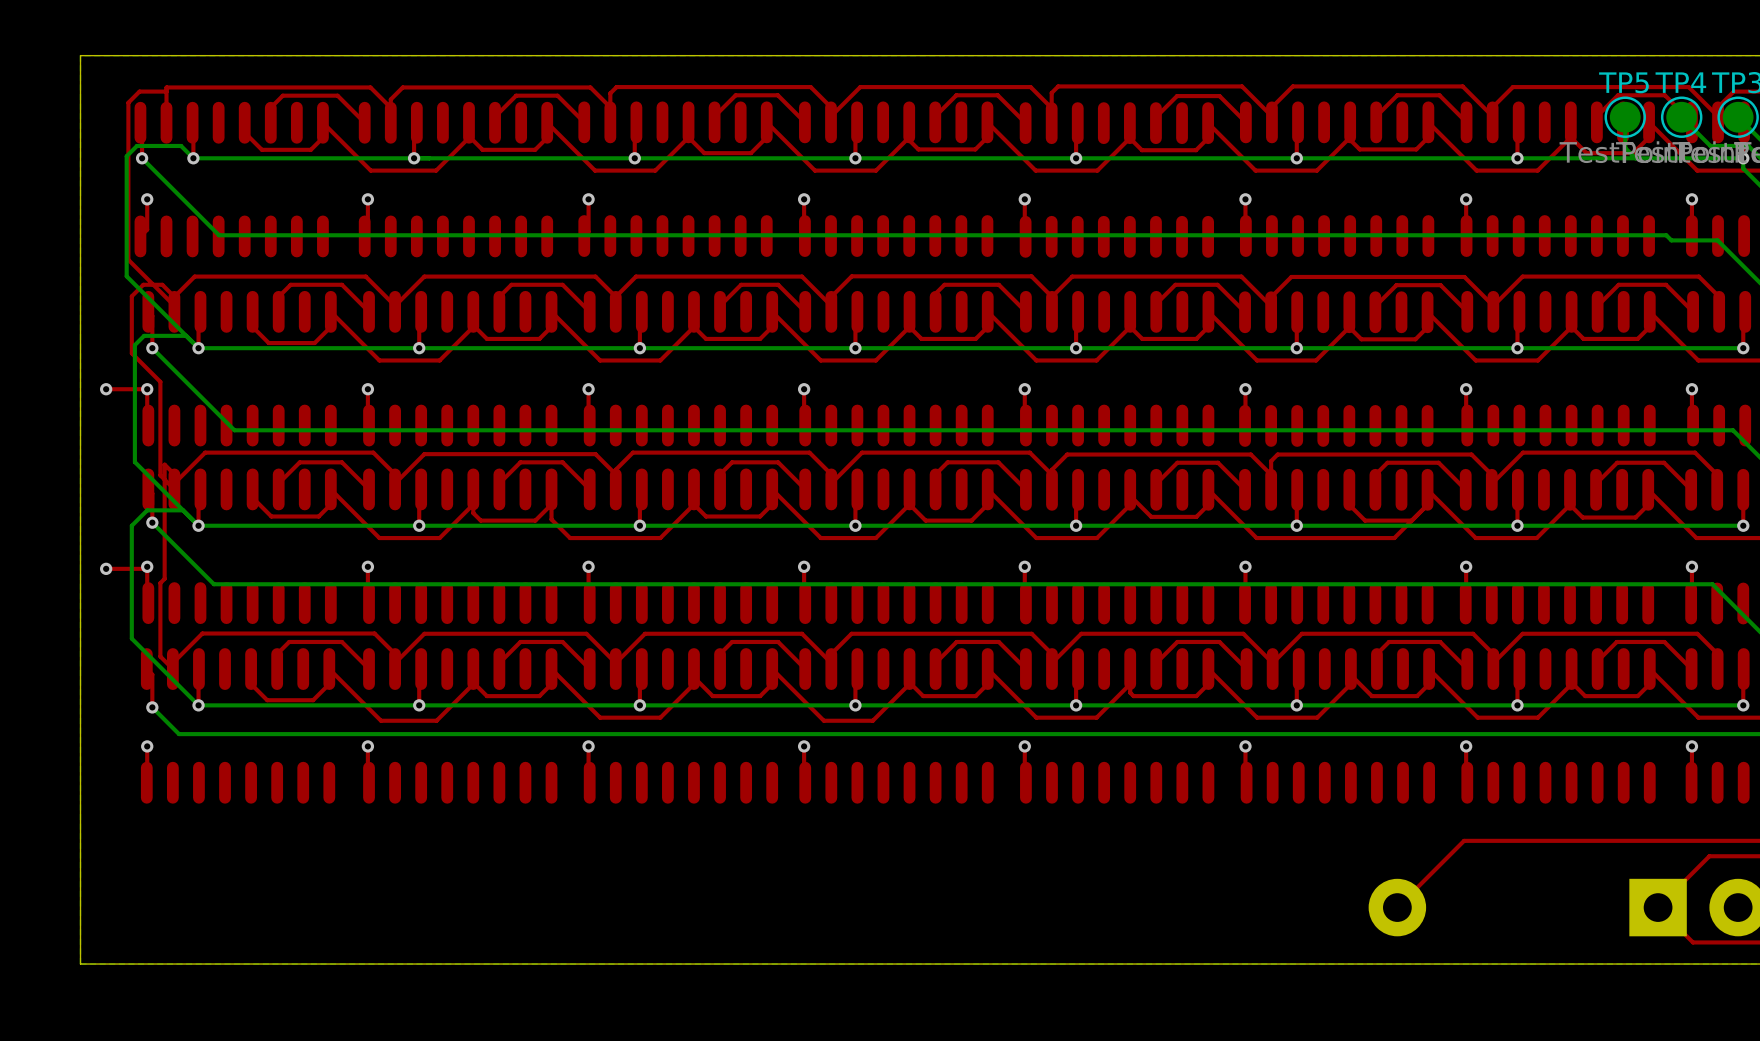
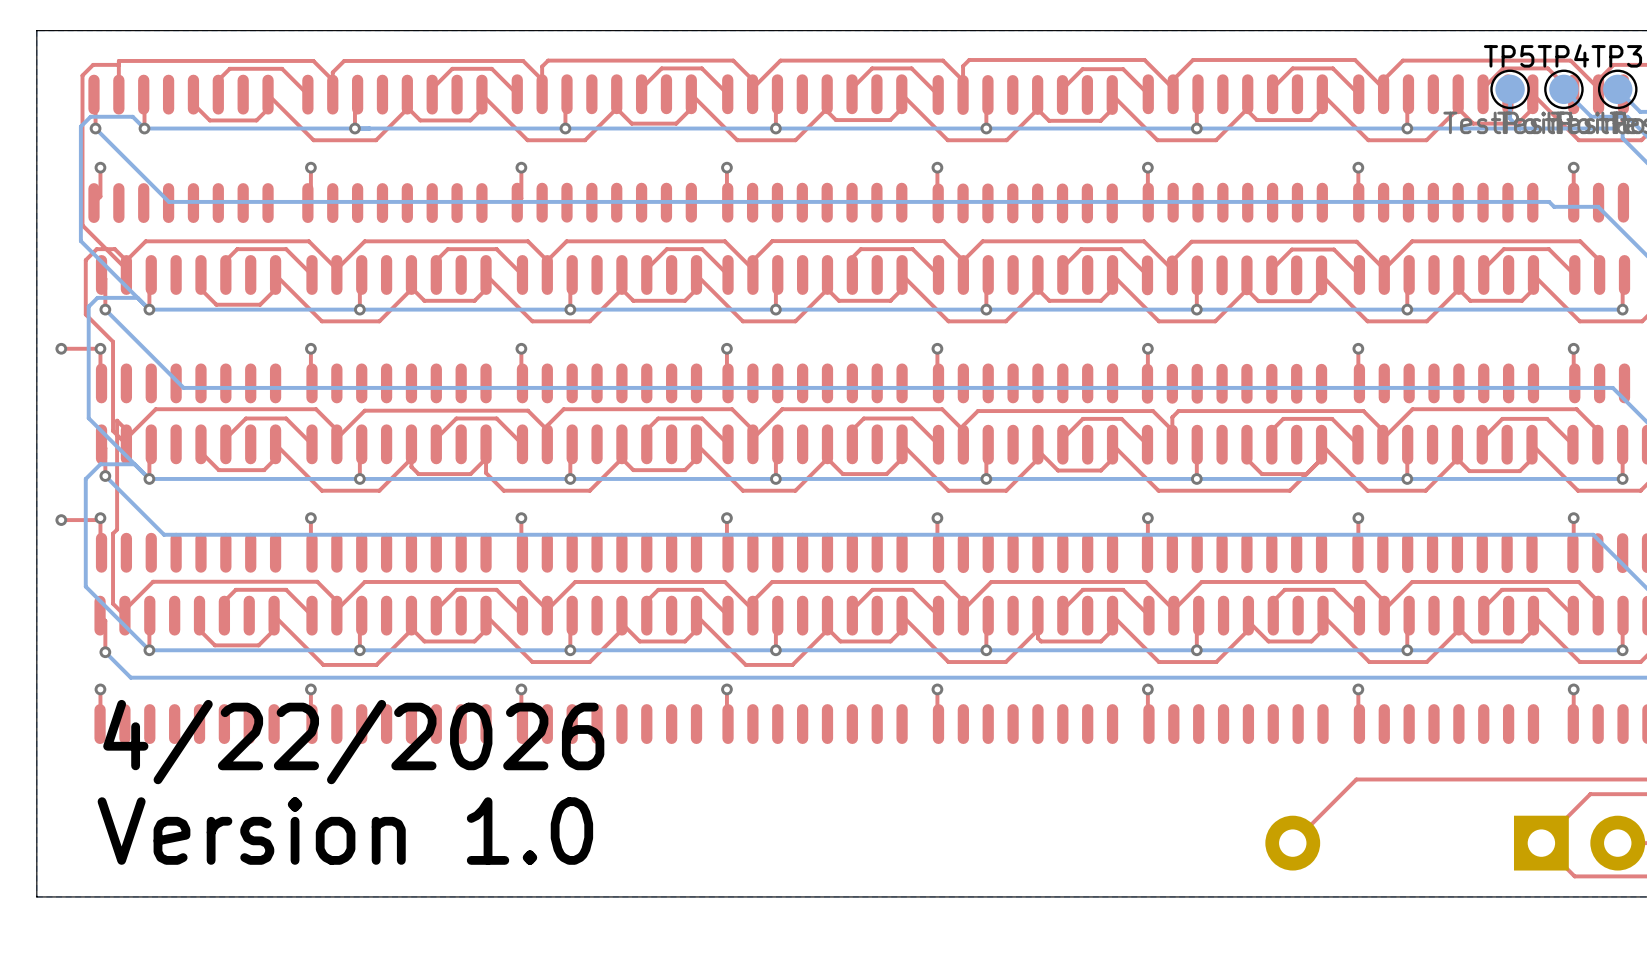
text: none -> 4/22/2026 (353, 742)
text: none -> Version 1.0 (345, 831)

